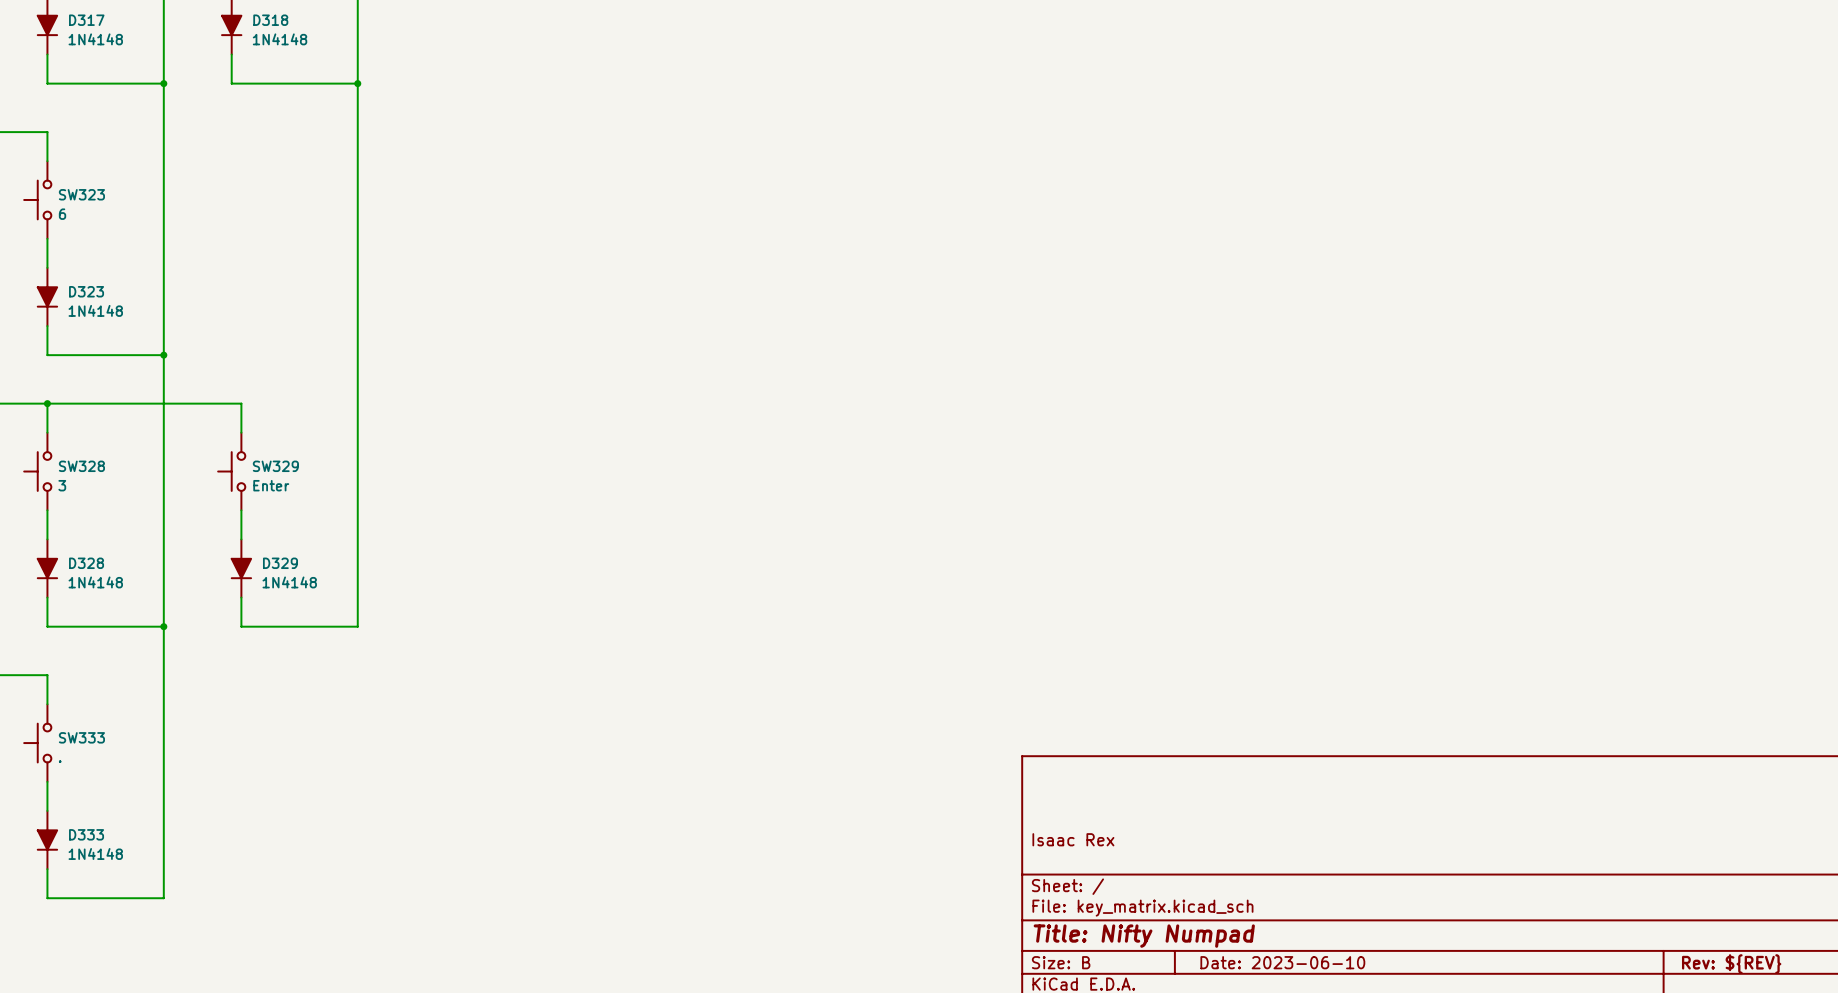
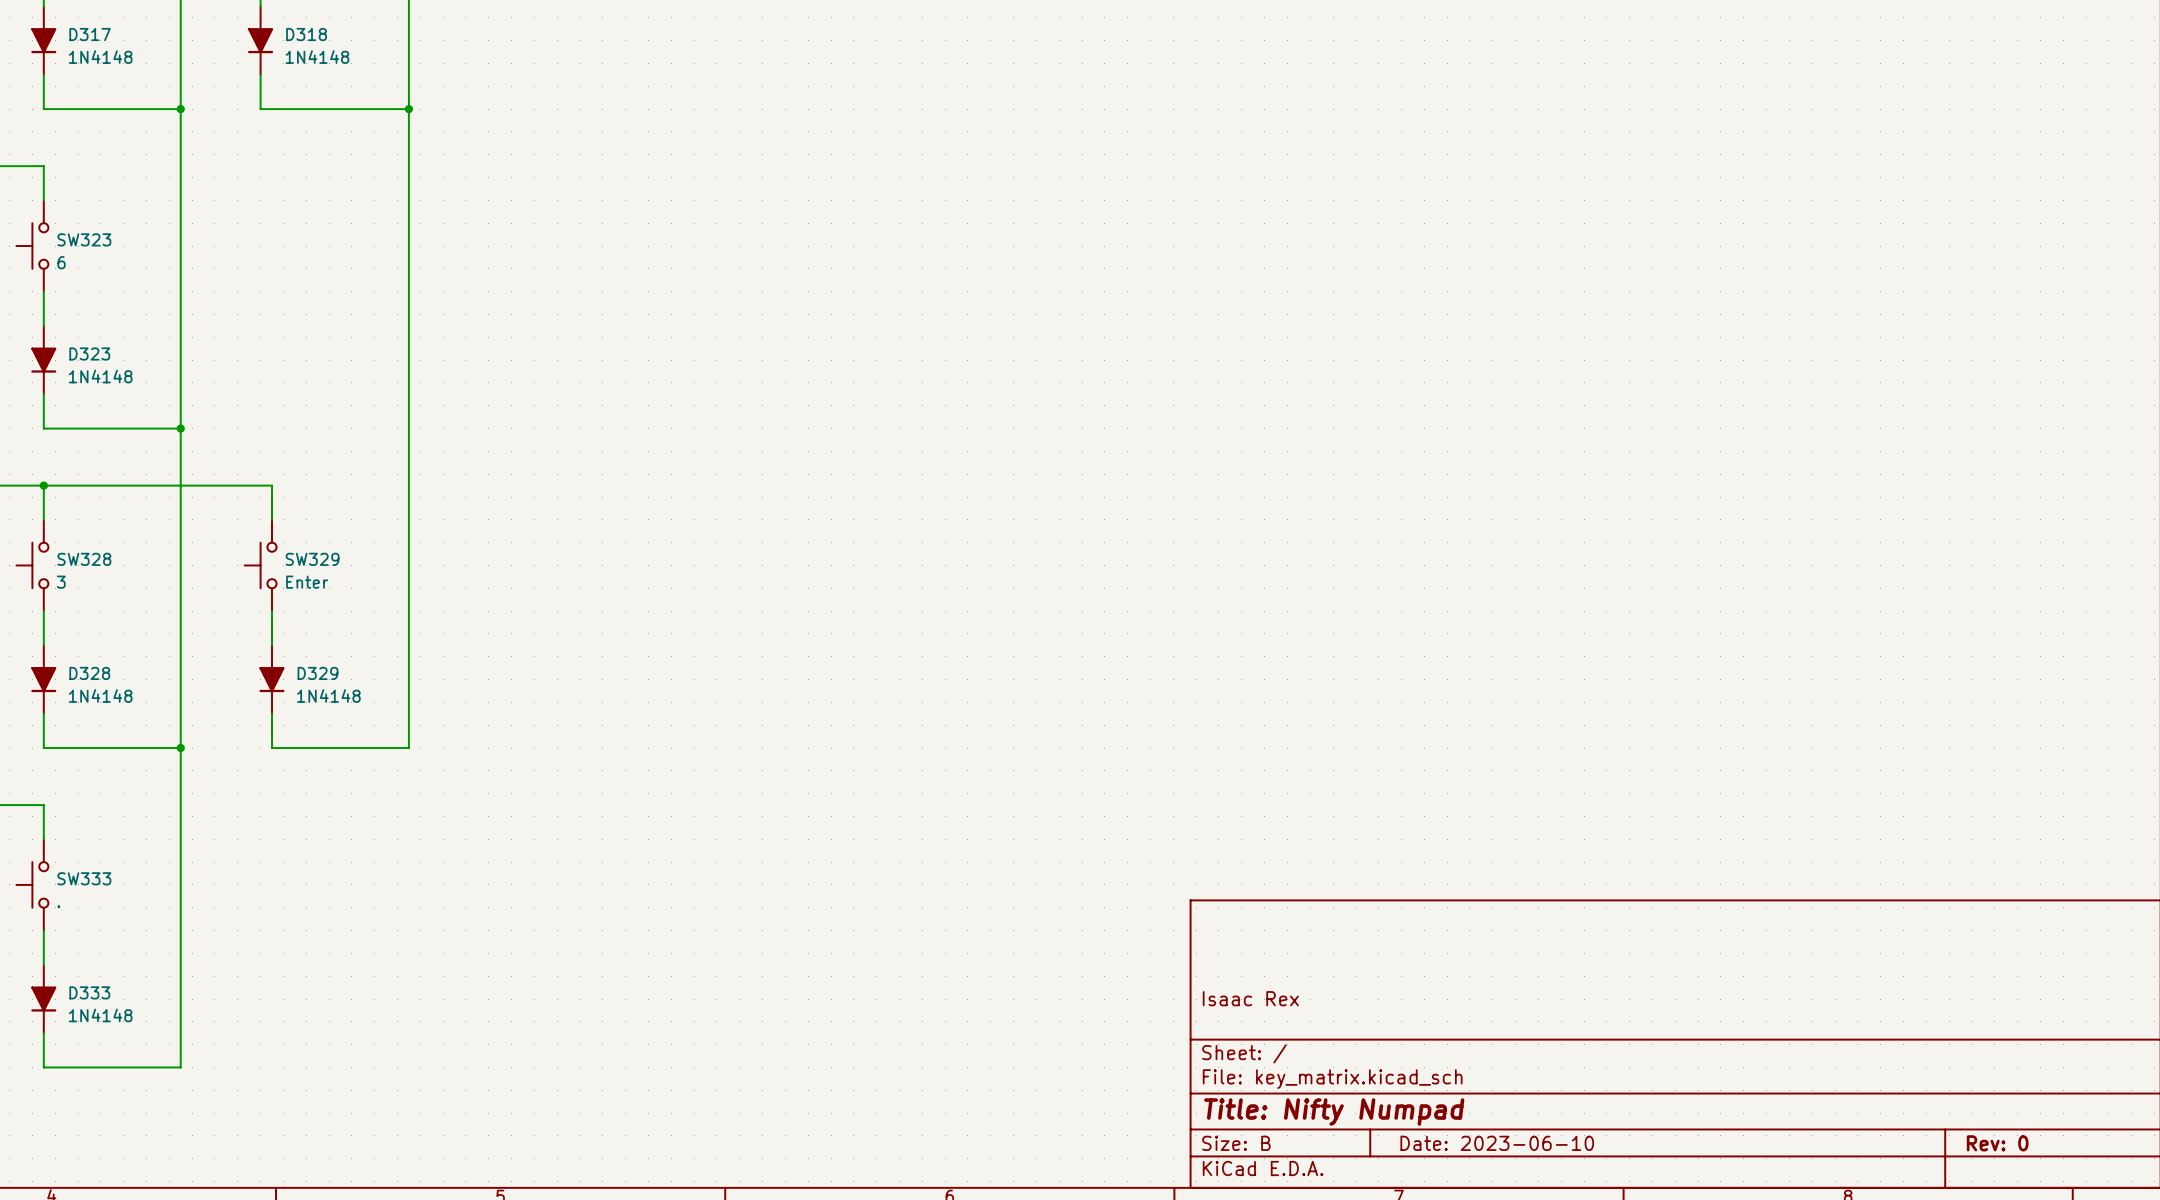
title block: Rev: ${REV} (1731, 964) -> Rev: 0 (1997, 1143)

